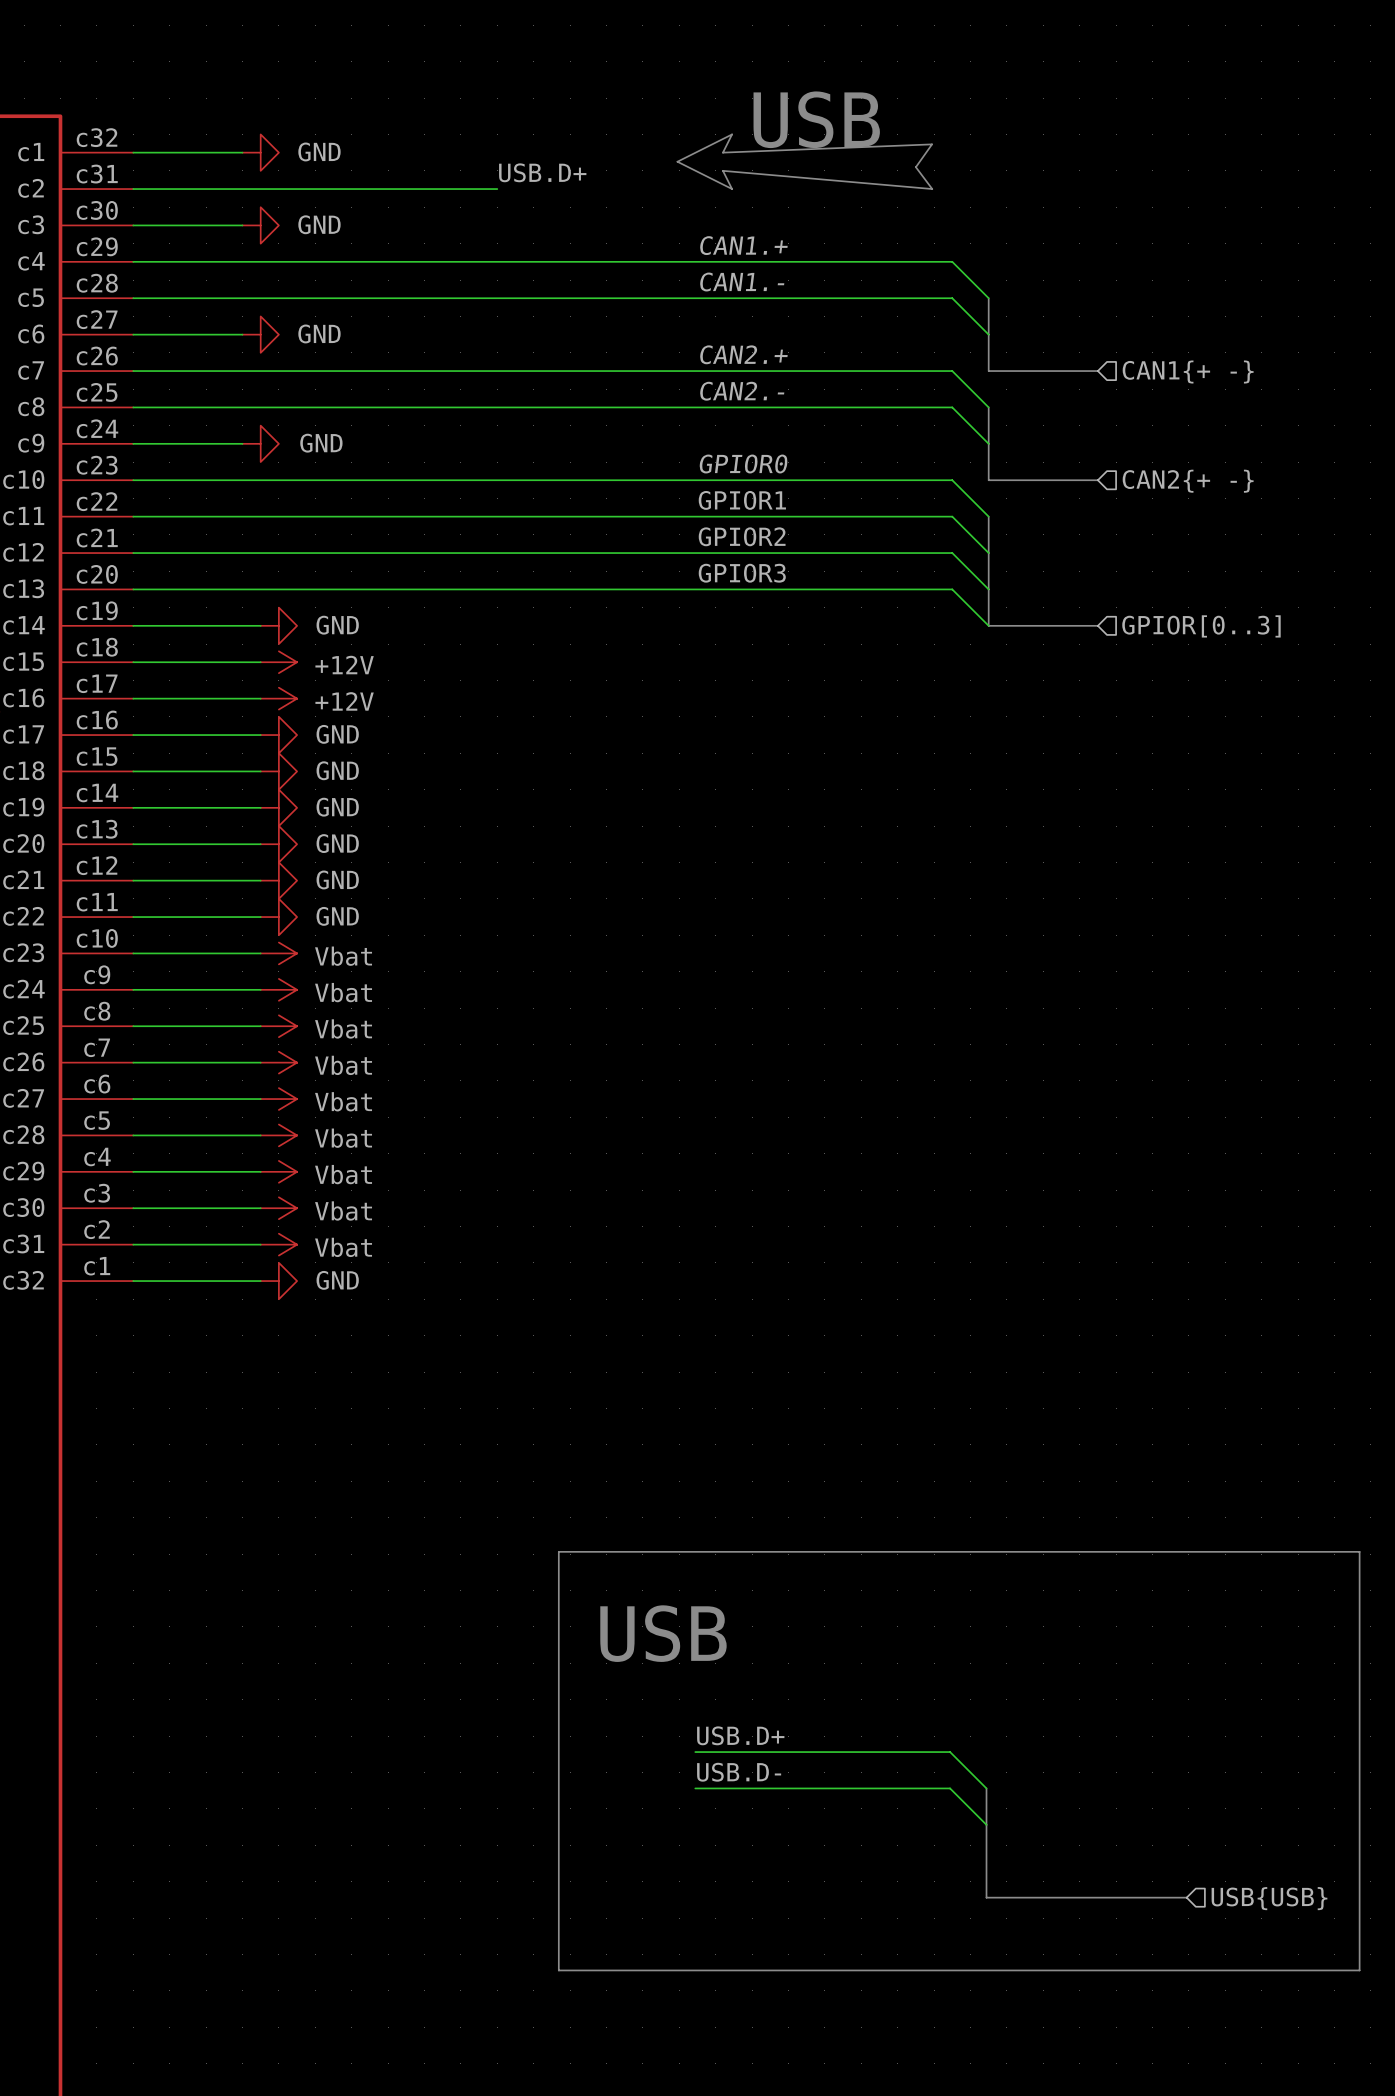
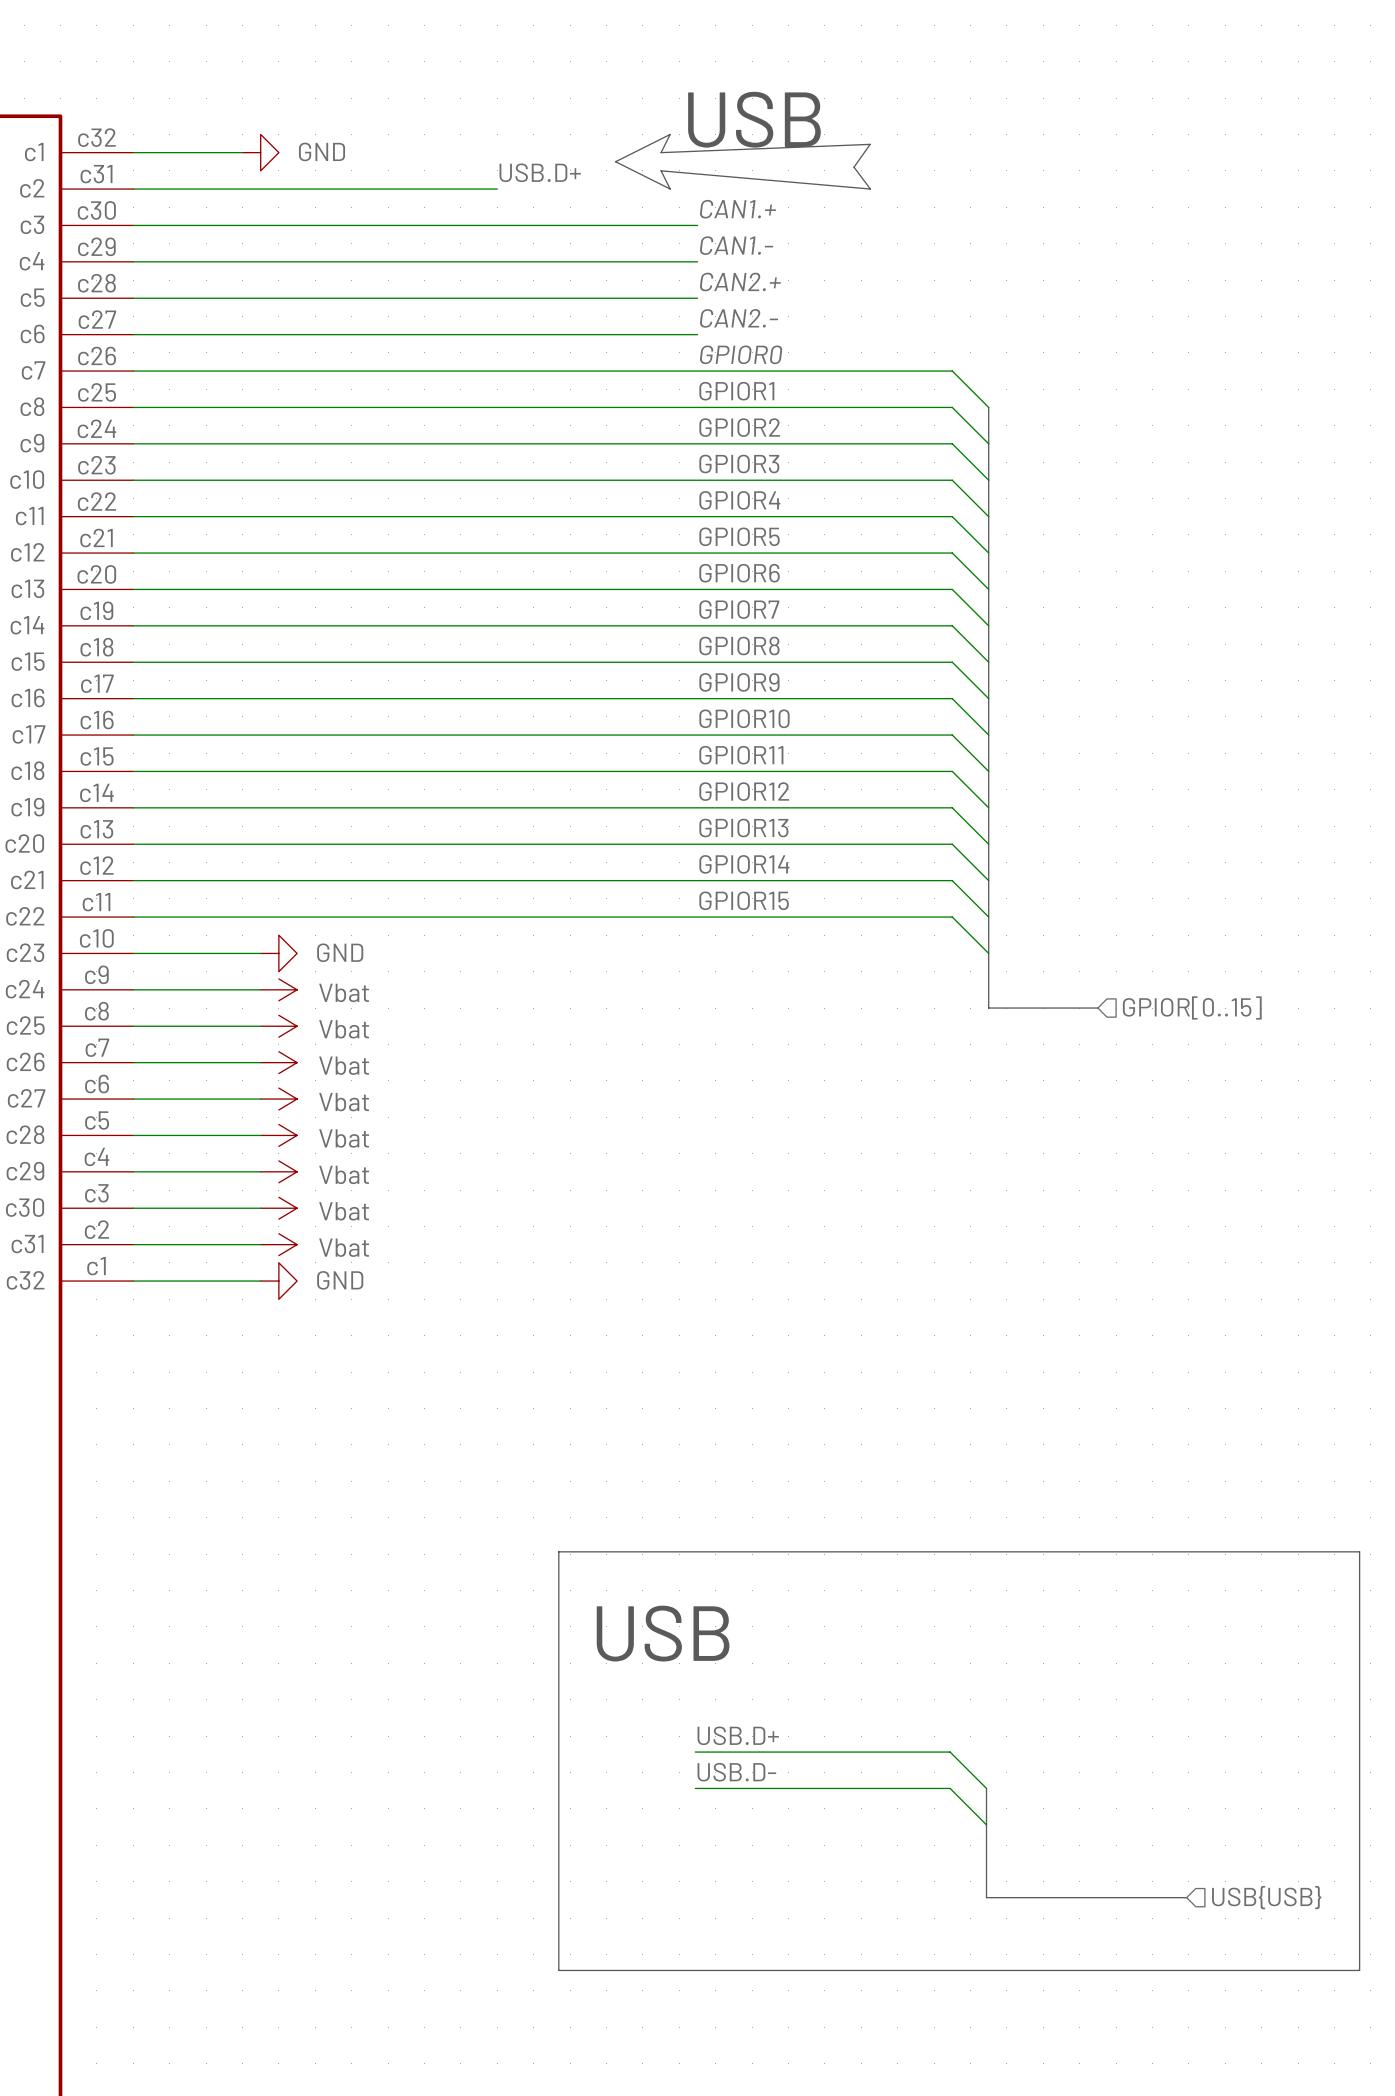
text position: USB (816, 119) -> USB (754, 119)
line: (732, 134) (722, 152) (932, 144) (915, 167) (932, 189) (722, 170) (732, 189) (677, 161) (732, 134) -> (670, 134) (661, 152) (870, 144) (854, 167) (870, 189) (661, 170) (670, 189) (615, 161) (670, 134)
label: none -> CAN1.+ (737, 209)
wire: none -> (242, 225) (697, 225)
power symbol: GND (260, 225) -> none
label: CAN1.+ (743, 245) -> CAN1.- (736, 245)
wire: (697, 261) (952, 261) (988, 298) -> none
label: CAN1.- (742, 282) -> CAN2.+ (740, 282)
wire: (697, 298) (952, 298) (988, 334) -> none
bus: (988, 298) (988, 371) (1097, 371) -> none
label: none -> CAN2.- (738, 318)
wire: none -> (242, 334) (697, 334)
power symbol: GND (260, 334) -> none
label: CAN2.+ (743, 354) -> GPIOR0 (741, 354)
hierarchical label: CAN1{+ -} (1188, 372) -> none
label: CAN2.- (742, 391) -> GPIOR1 (736, 391)
label: none -> GPIOR2 (739, 427)
wire: none -> (242, 443) (952, 443) (988, 480)
power symbol: GND (260, 443) -> none
label: GPIOR0 (743, 464) -> GPIOR3 (739, 463)
bus: (988, 480) (1097, 480) -> (988, 480) (988, 516)
hierarchical label: CAN2{+ -} (1188, 481) -> none
label: GPIOR1 (742, 500) -> GPIOR4 (739, 500)
label: GPIOR2 (742, 536) -> GPIOR5 (739, 536)
label: GPIOR3 (742, 573) -> GPIOR6 (739, 573)
label: none -> GPIOR7 (739, 609)
wire: none -> (260, 625) (952, 625) (988, 662)
power symbol: GND (278, 625) -> none
bus: (988, 625) (1097, 625) -> (988, 625) (988, 1008) (1097, 1008)
hierarchical label: GPIOR[0..3] (1201, 626) -> none
label: none -> GPIOR8 (739, 645)
wire: none -> (260, 662) (952, 662) (988, 698)
power symbol: +12V (278, 662) -> none
label: none -> GPIOR9 (739, 682)
wire: none -> (260, 698) (952, 698) (988, 735)
power symbol: +12V (278, 698) -> none
label: none -> GPIOR10 (744, 718)
wire: none -> (260, 735) (952, 735) (988, 771)
power symbol: GND (278, 735) -> none
label: none -> GPIOR11 (741, 755)
wire: none -> (260, 771) (952, 771) (988, 807)
power symbol: GND (278, 771) -> none
label: none -> GPIOR12 (744, 791)
wire: none -> (260, 807) (952, 807) (988, 844)
power symbol: GND (278, 807) -> none
label: none -> GPIOR13 (743, 827)
wire: none -> (260, 844) (952, 844) (988, 880)
power symbol: GND (278, 844) -> none
label: none -> GPIOR14 (744, 864)
wire: none -> (260, 880) (952, 880) (988, 917)
power symbol: GND (278, 880) -> none
label: none -> GPIOR15 (744, 900)
wire: none -> (260, 917) (952, 917) (988, 953)
power symbol: GND (278, 917) -> none
power symbol: Vbat (278, 953) -> GND (278, 953)
hierarchical label: none -> GPIOR[0..15] (1192, 1007)

